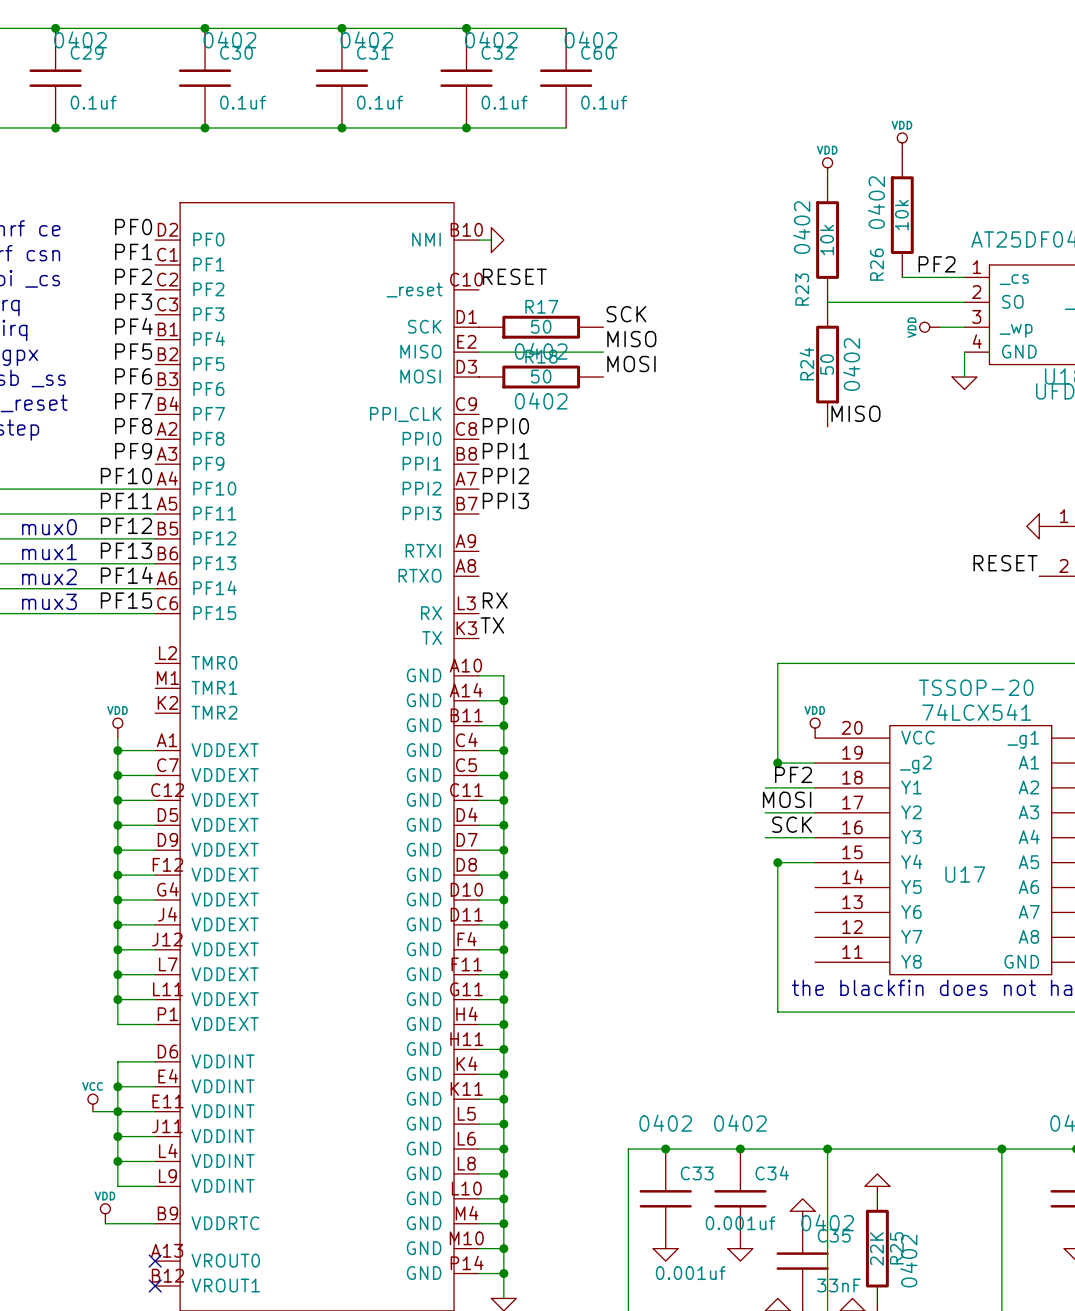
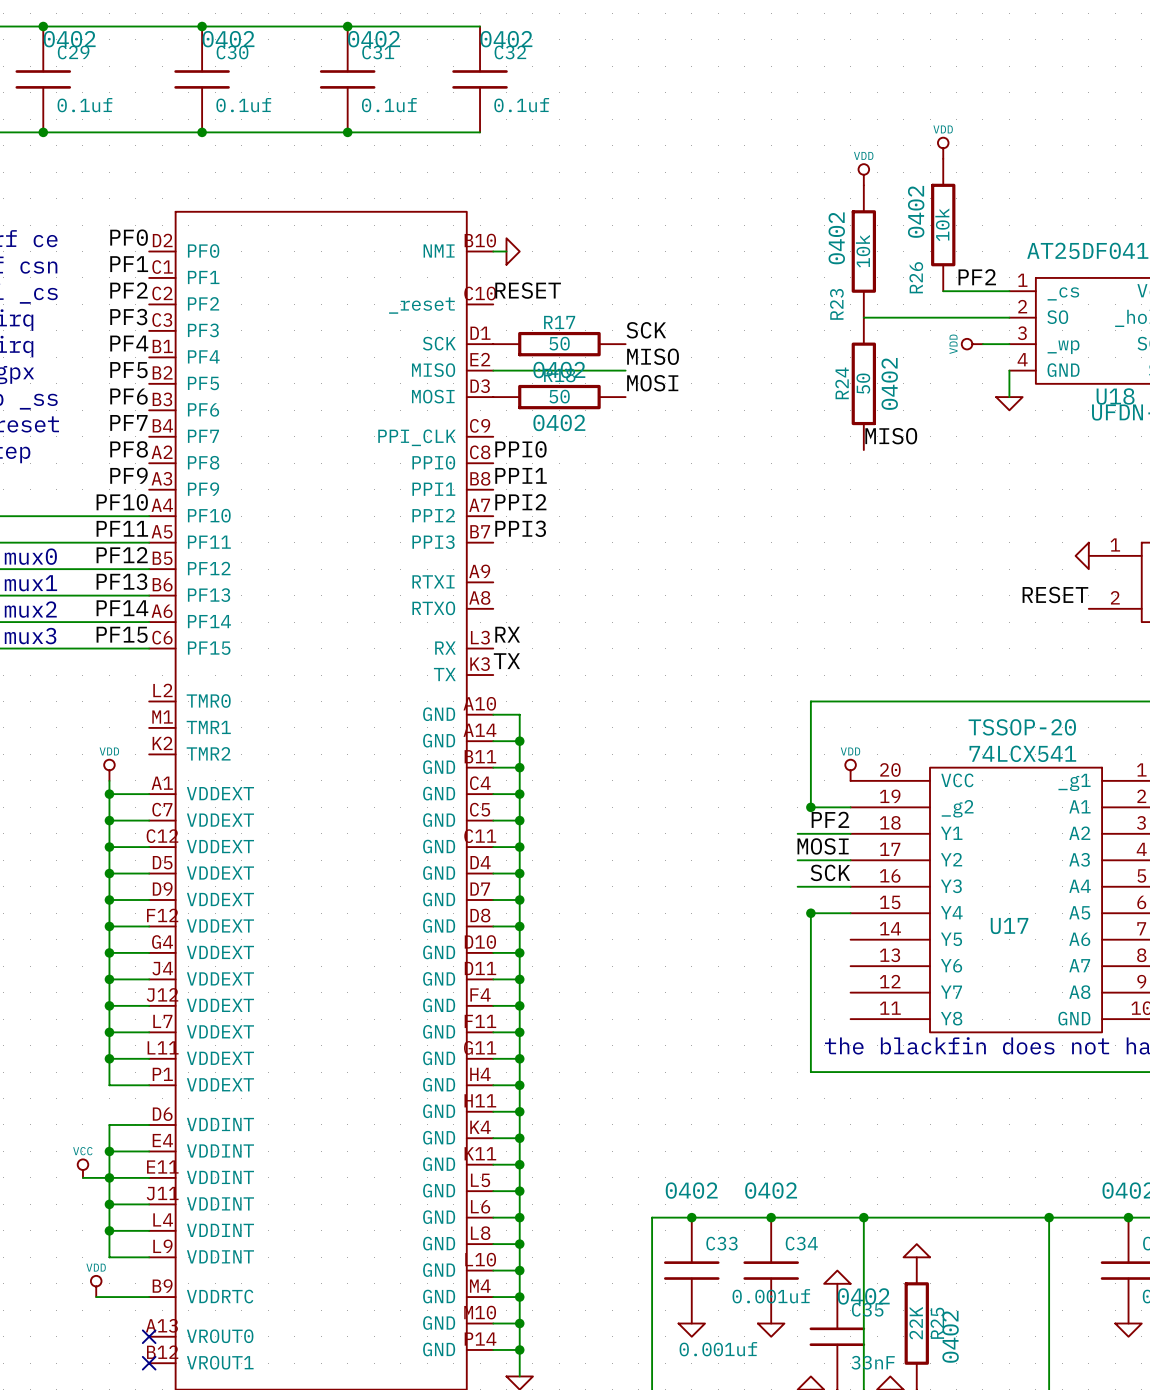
wire: (466, 28) (566, 28) -> none
junction: (466, 28) -> none
C60: 0.1uf (566, 78) -> none
wire: (466, 127) (566, 127) -> none
junction: (466, 127) -> none

